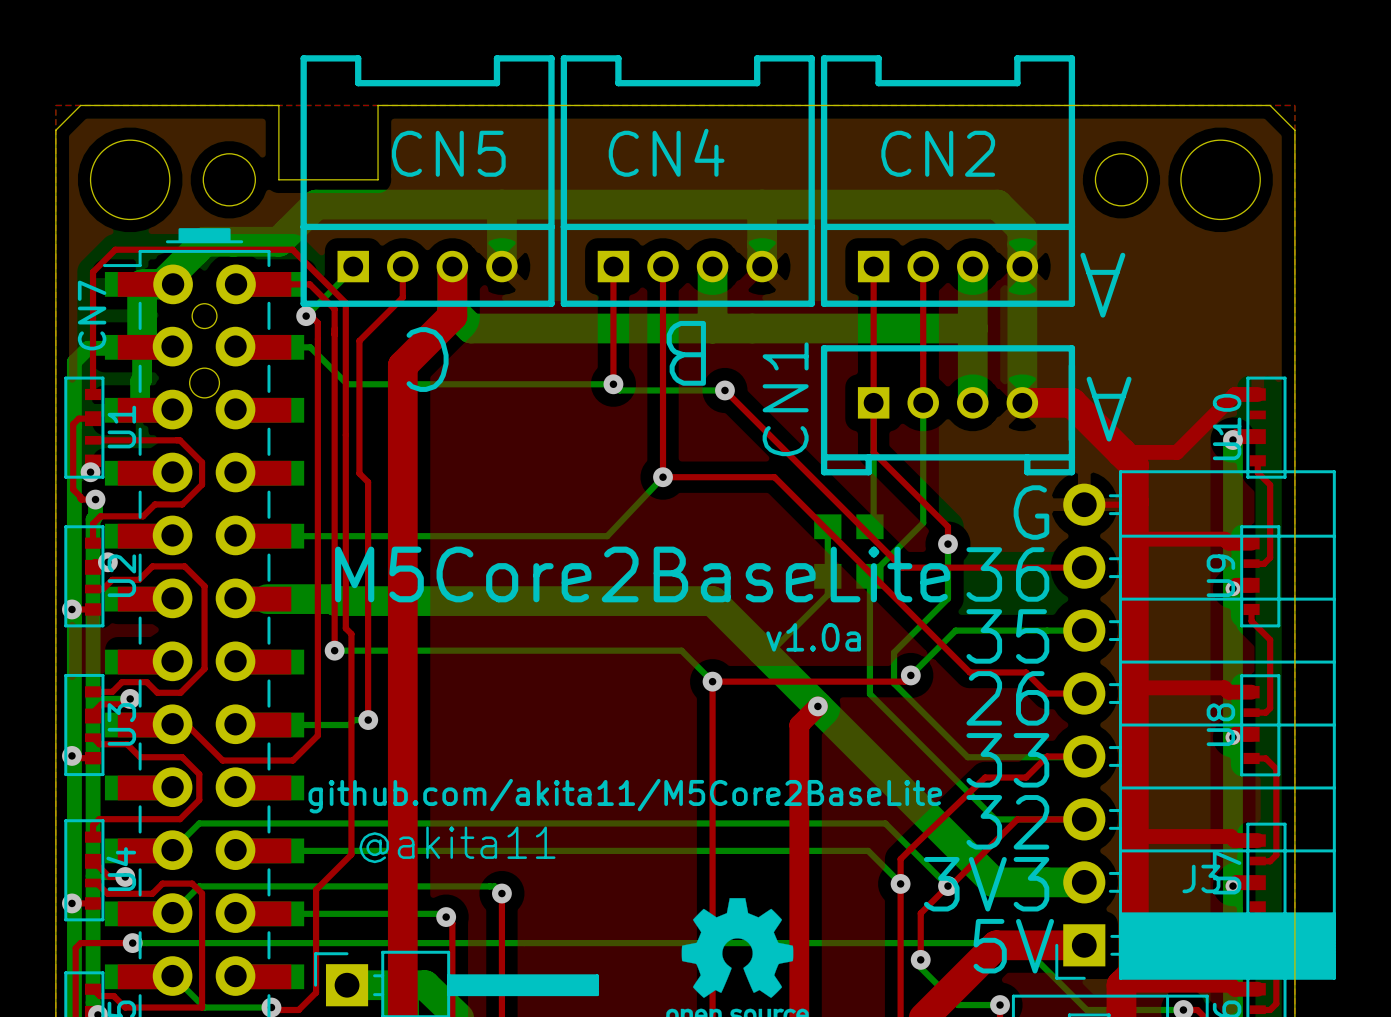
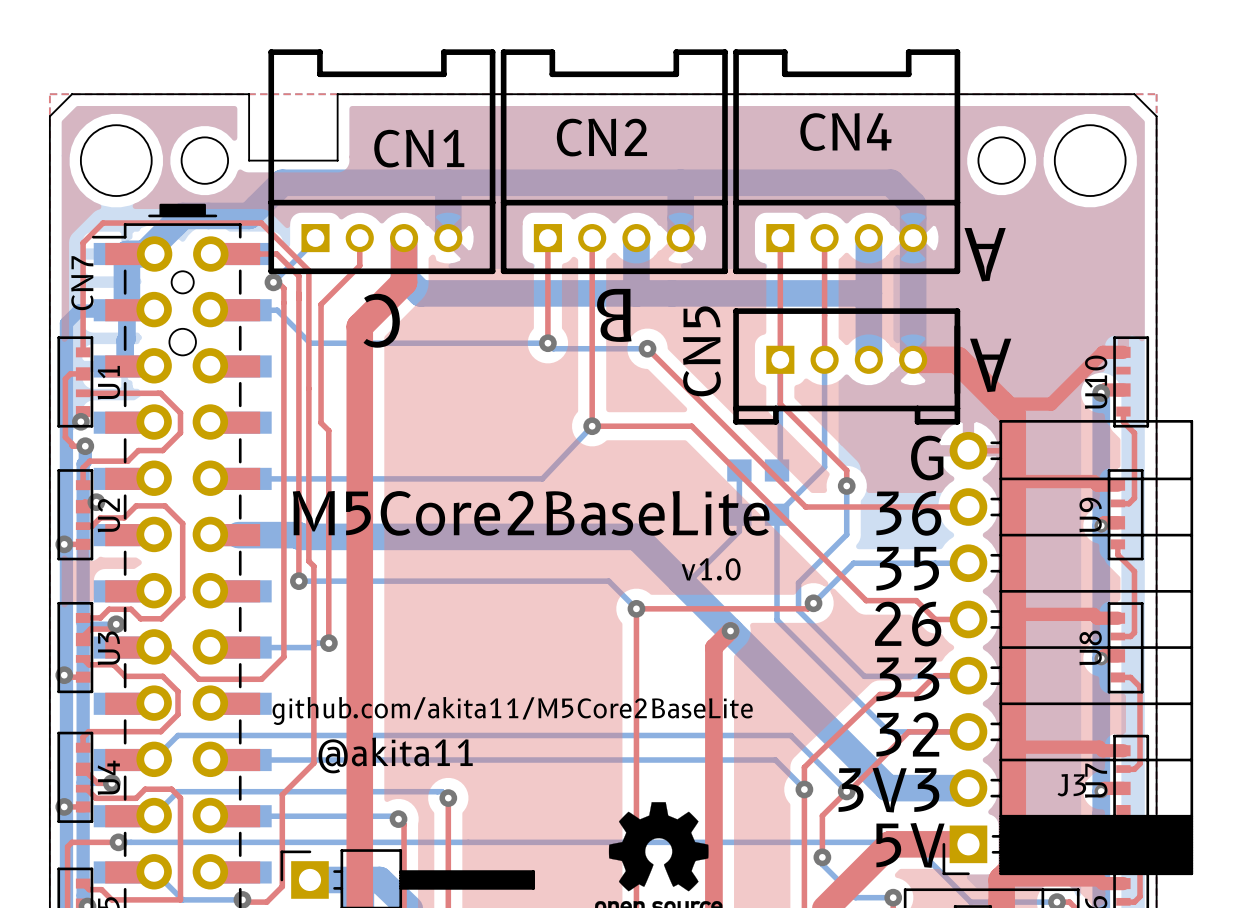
CN4 name: CN4 (666, 152) -> CN2 (601, 137)
CN5 name: CN5 (448, 153) -> CN1 (419, 148)
CN2 name: CN2 (938, 153) -> CN4 (845, 132)
CN1 name: CN1 (785, 399) -> CN5 (701, 351)
text: v1.0a (813, 637) -> v1.0 (711, 569)

